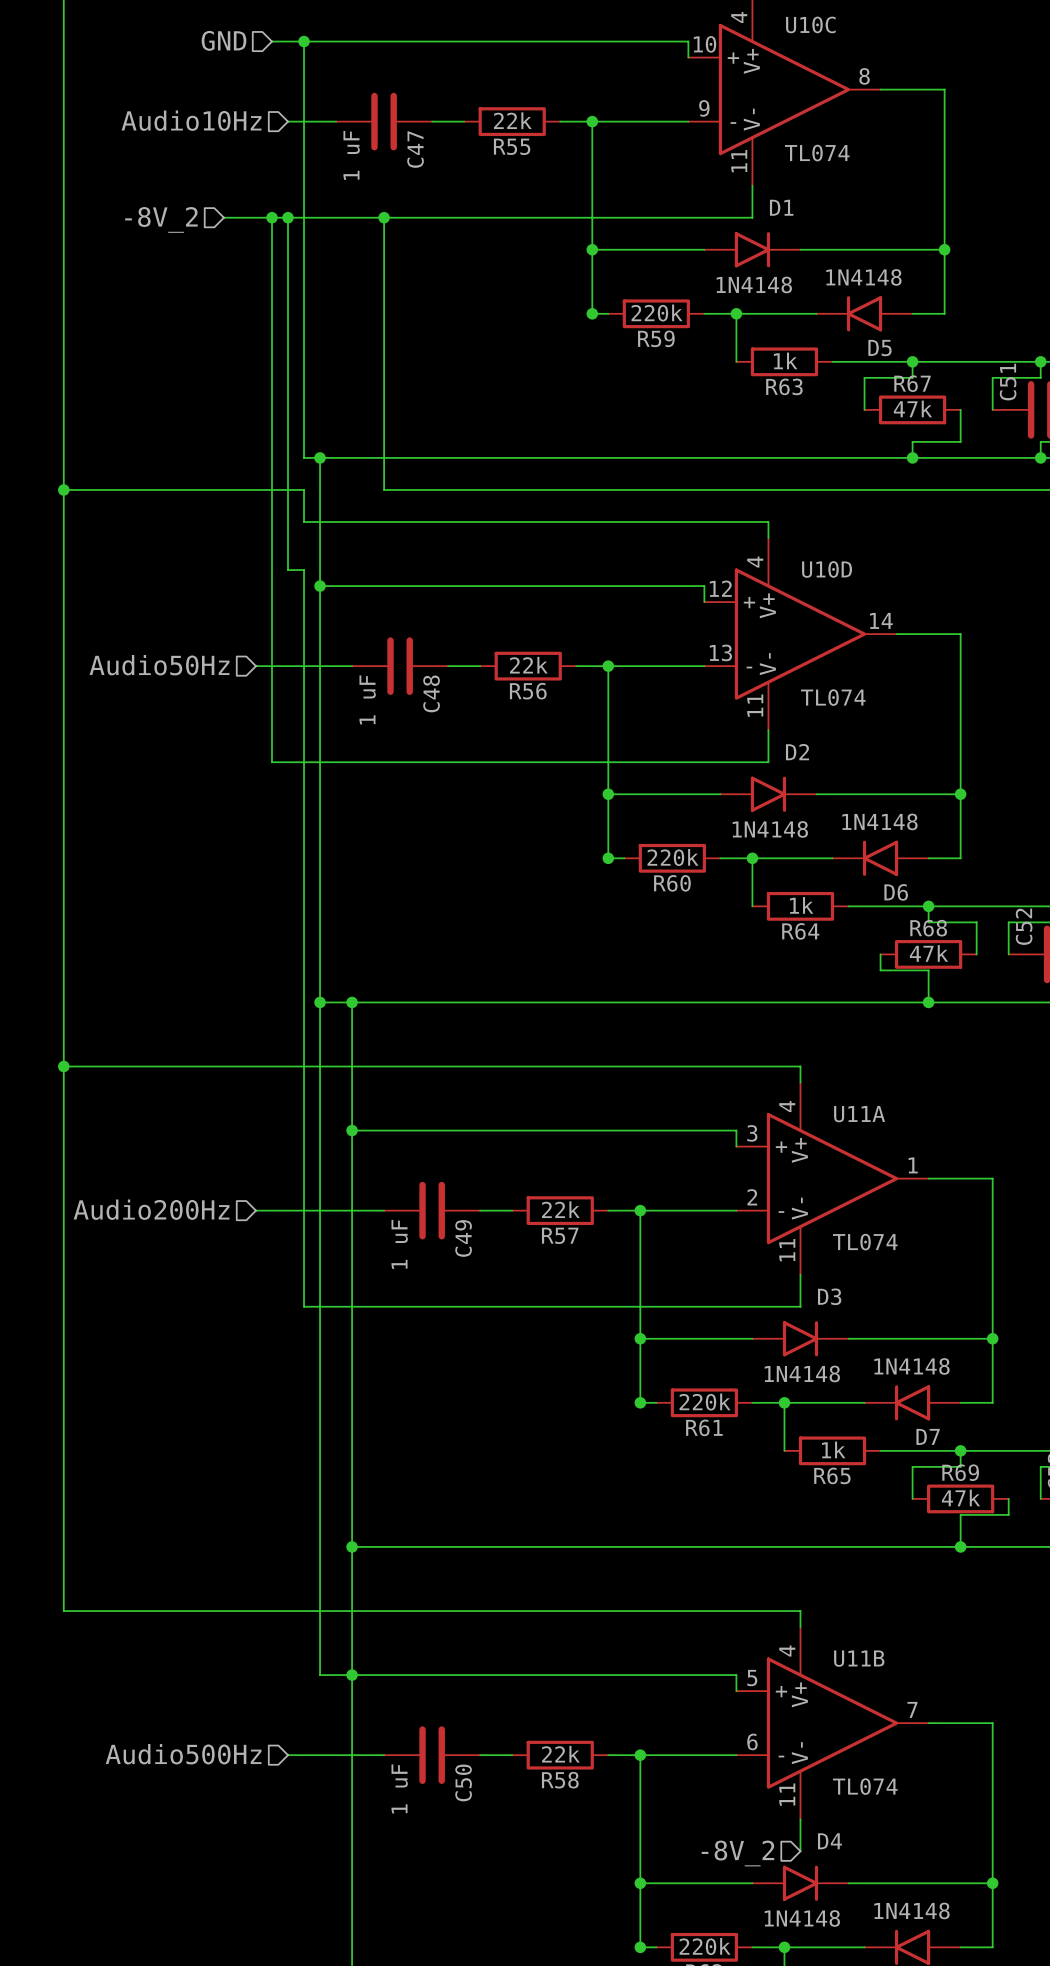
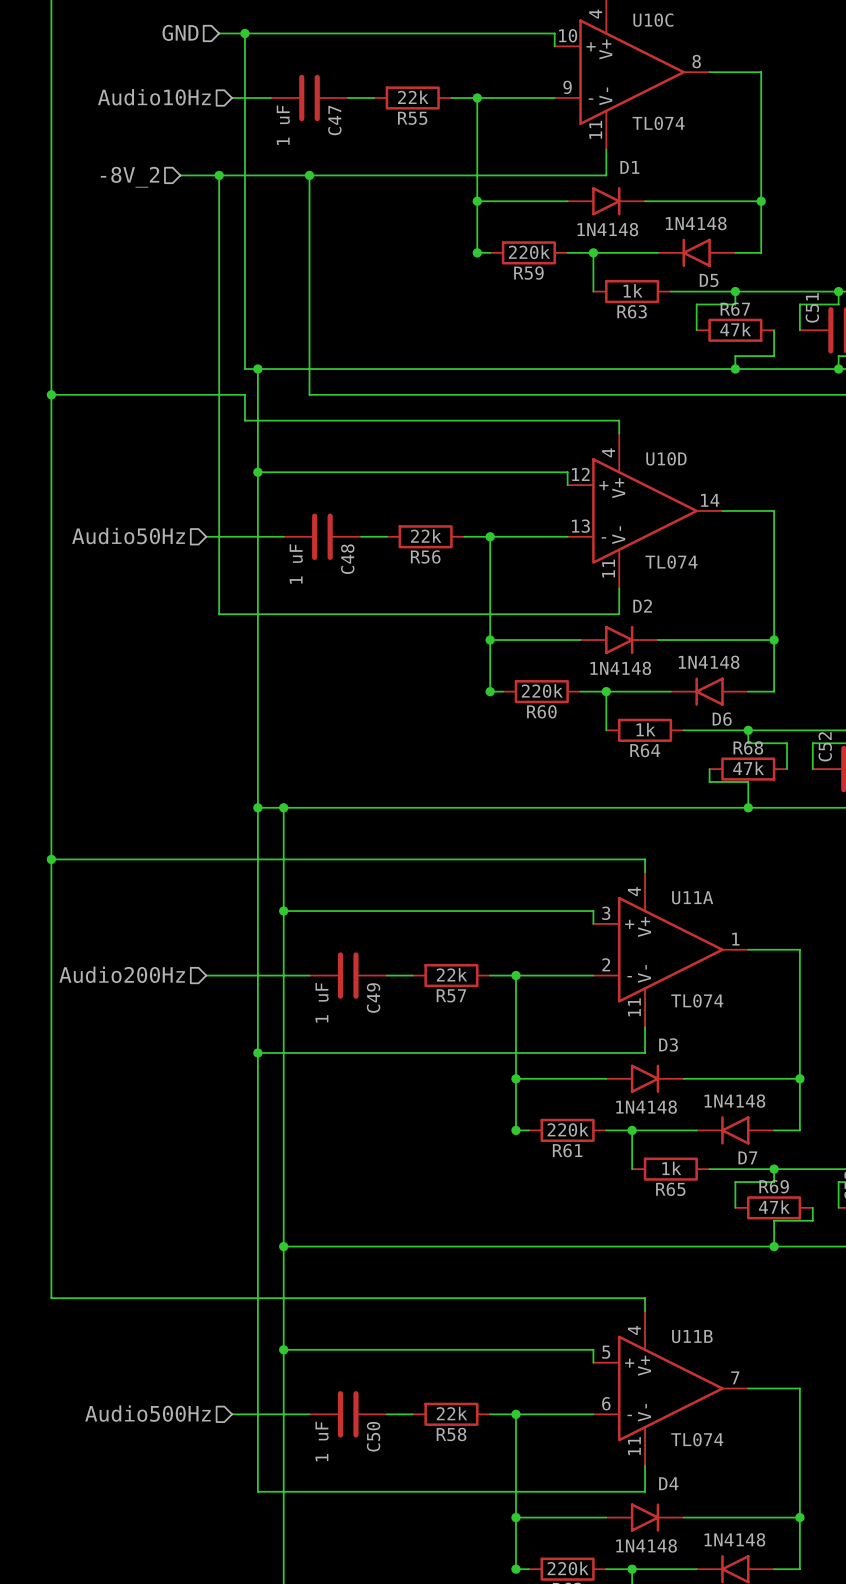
wire: (288, 217) (288, 570) (304, 570) (304, 1306) (320, 1306) -> none
junction: (288, 217) -> none
junction: none -> (257, 1052)
wire: (320, 1675) (352, 1675) -> (257, 1349) (257, 1491) (645, 1491)
hierarchical label: -8V_2 (737, 1853) -> none

